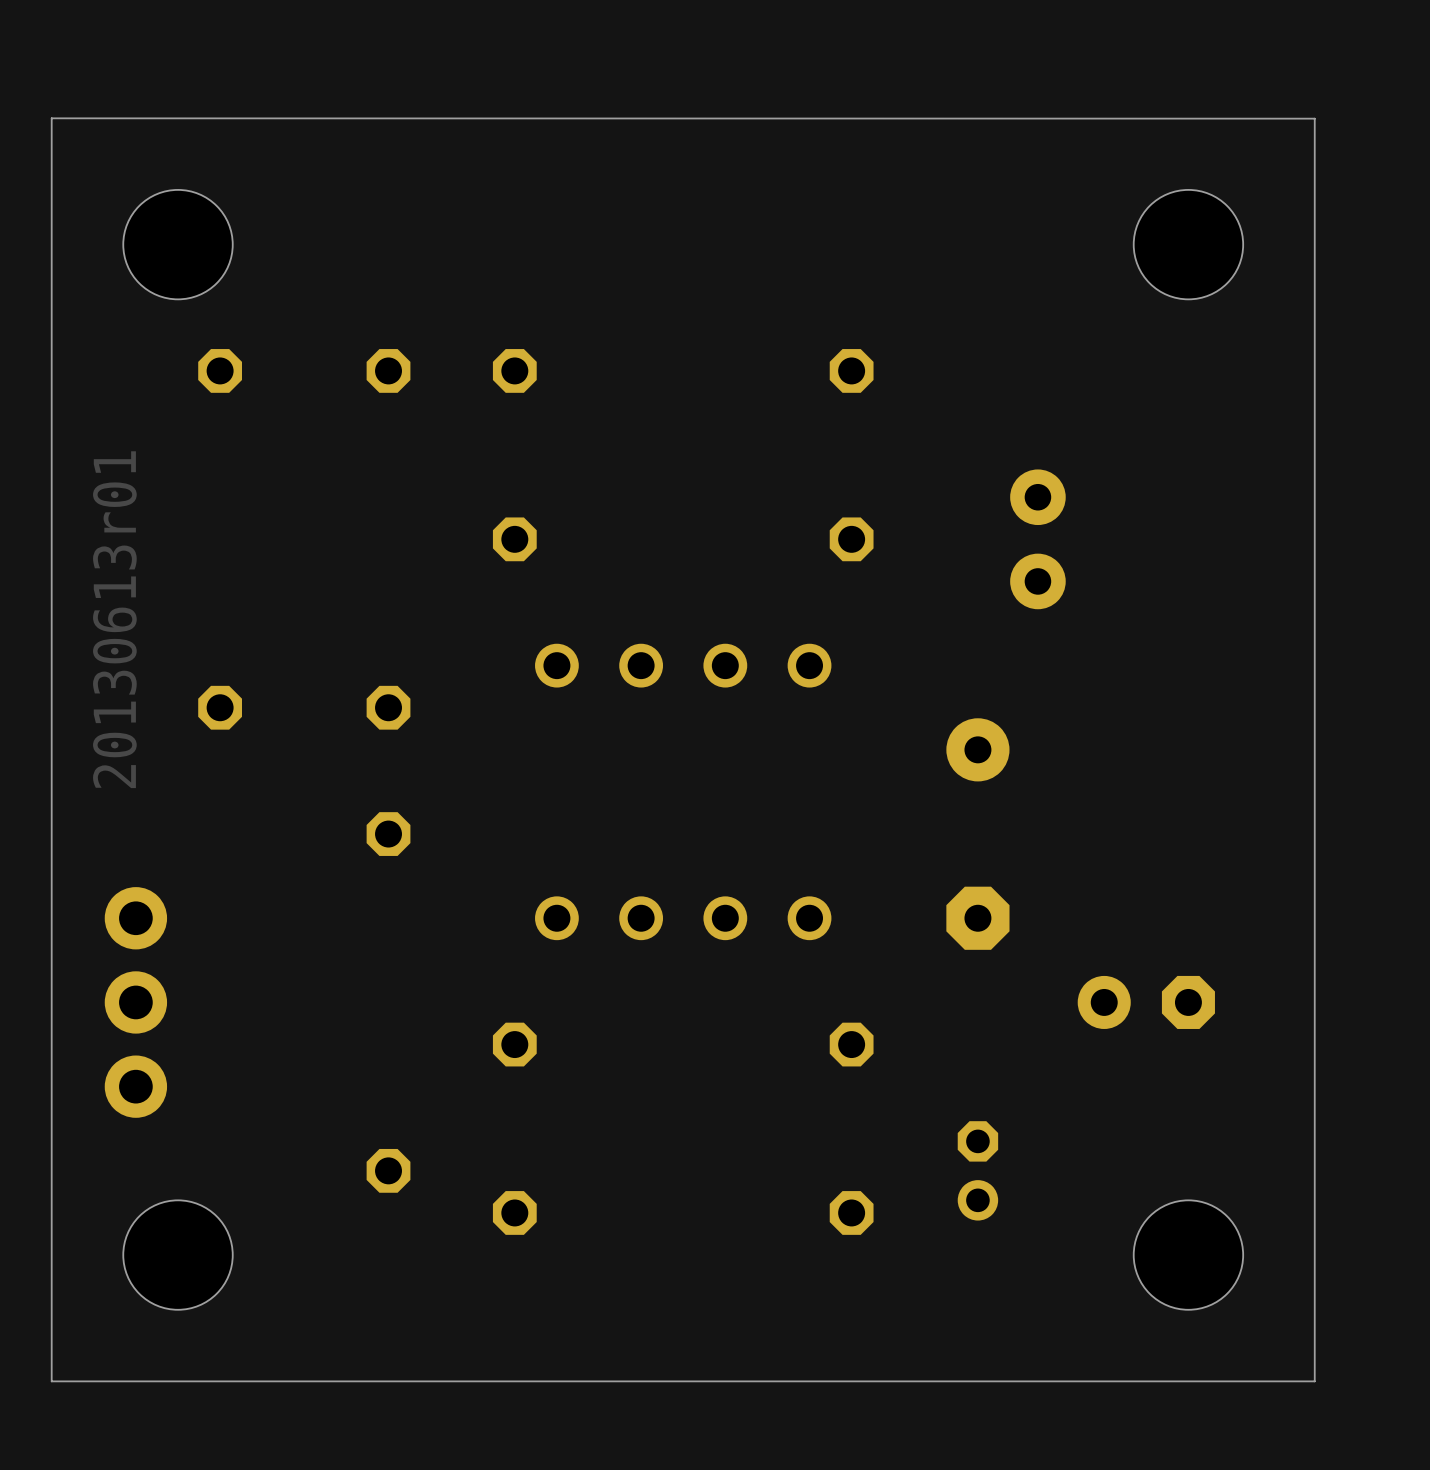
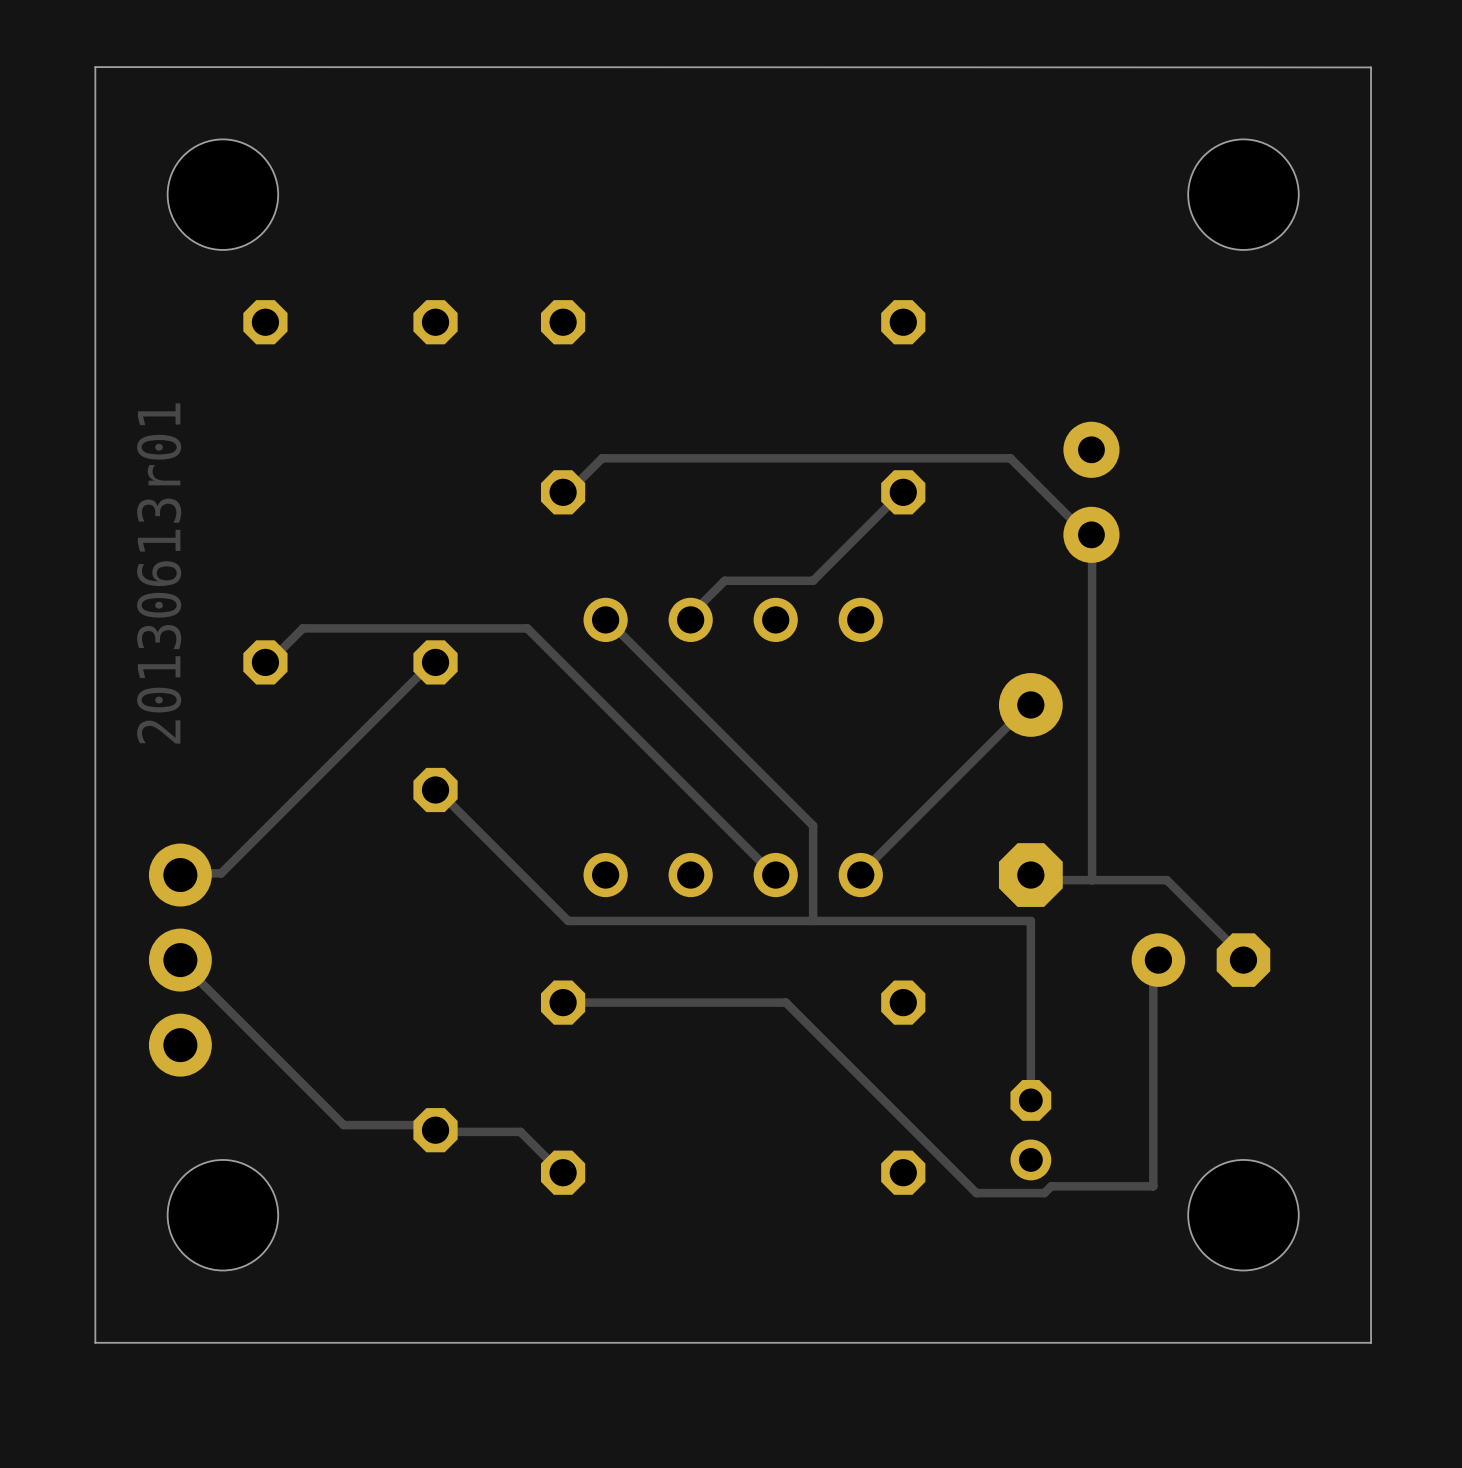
track: none -> (563, 492) (568, 492) (602, 458) (1010, 458) (1085, 533) (1091, 534) (1092, 880)
track: none -> (903, 492) (813, 580) (724, 580) (690, 614) (690, 619)
track: none -> (605, 619) (813, 825) (813, 920)
track: none -> (265, 662) (268, 662) (302, 628) (527, 628) (775, 875)
track: none -> (435, 662) (432, 662) (221, 873) (180, 873) (180, 875)
track: none -> (1030, 704) (1030, 710) (1024, 710) (860, 875)
track: none -> (435, 789) (568, 920) (1030, 920) (1030, 1100)
track: none -> (1030, 875) (1030, 880) (1166, 880) (1241, 954) (1243, 960)
track: none -> (180, 960) (343, 1125) (432, 1125) (438, 1131) (520, 1131) (563, 1172)
track: none -> (1158, 960) (1153, 961) (1153, 1186) (1051, 1186) (1044, 1193) (976, 1193) (785, 1002) (563, 1002)

